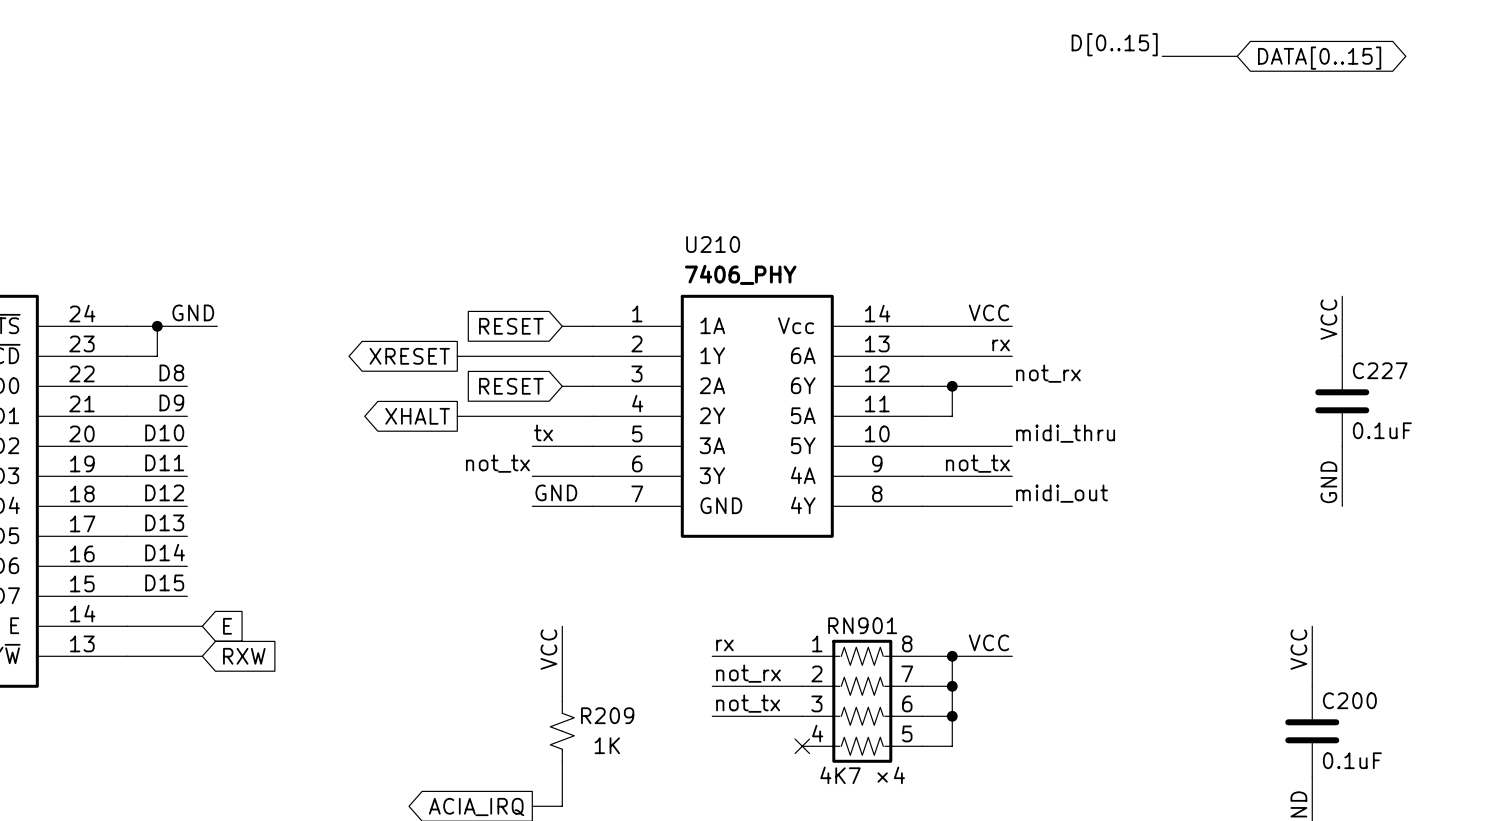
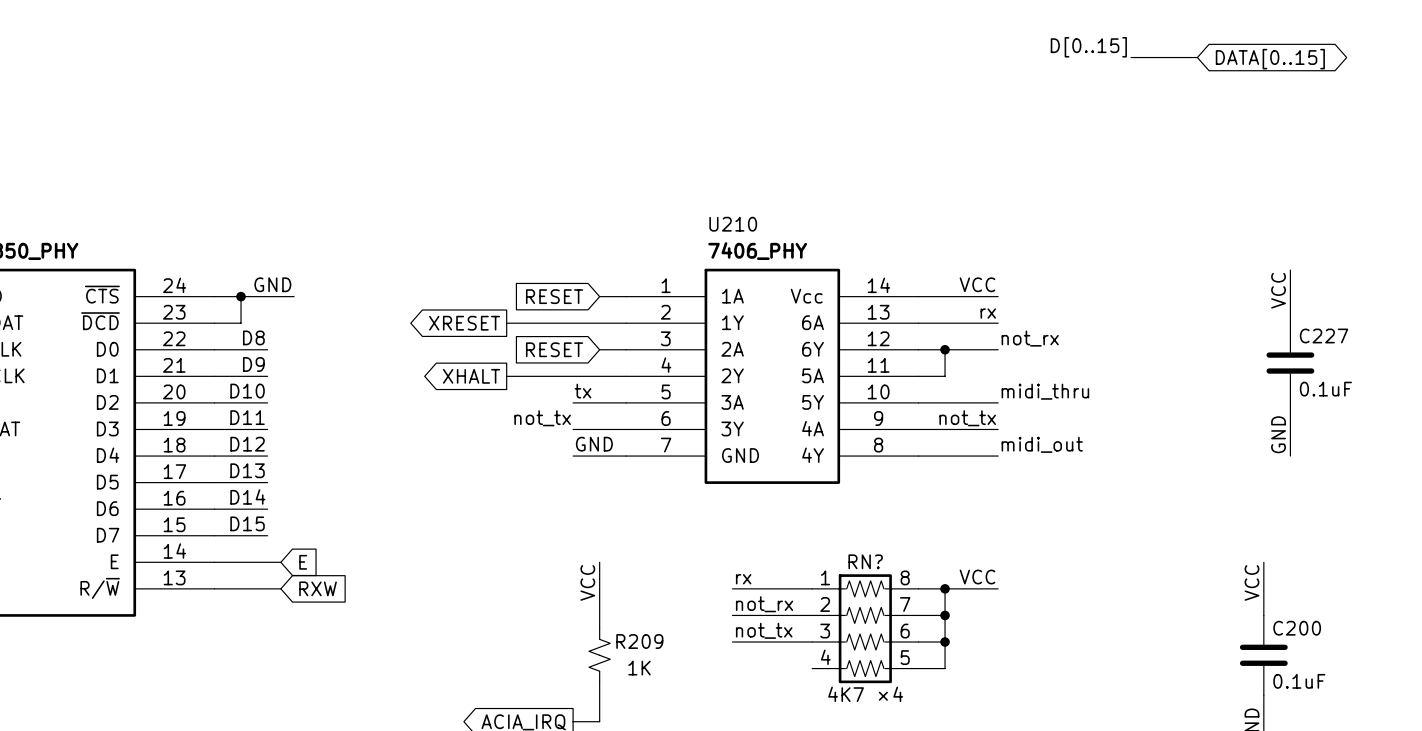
RN901 name: RN901 (862, 625) -> RN? (865, 561)
no-connect mark: (802, 746) -> none

